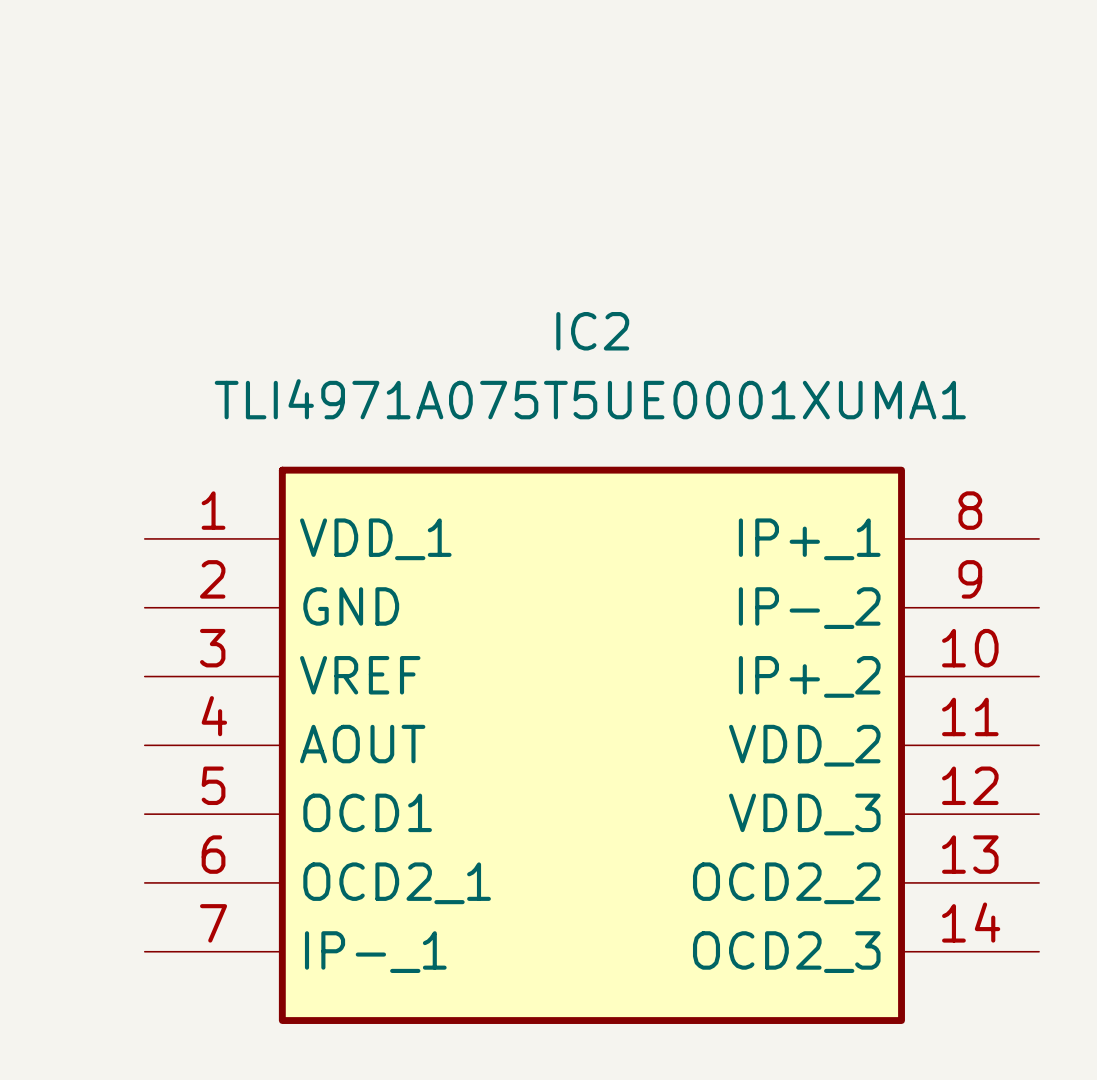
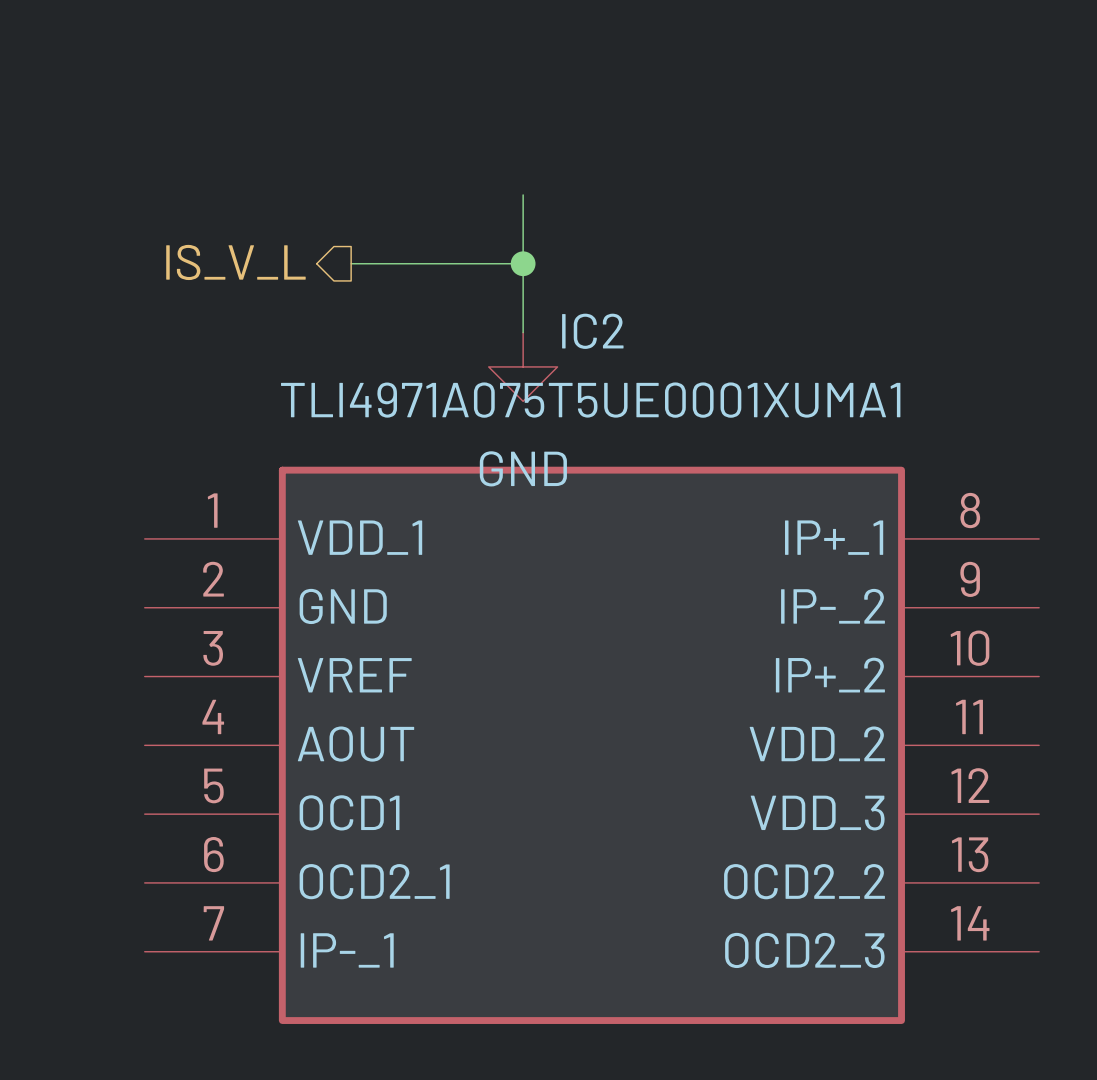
wire: none -> (523, 194) (523, 332)
wire: none -> (351, 263) (523, 263)
junction: none -> (523, 263)
hierarchical label: none -> IS_V_L (235, 262)
power symbol: none -> GND (523, 366)

